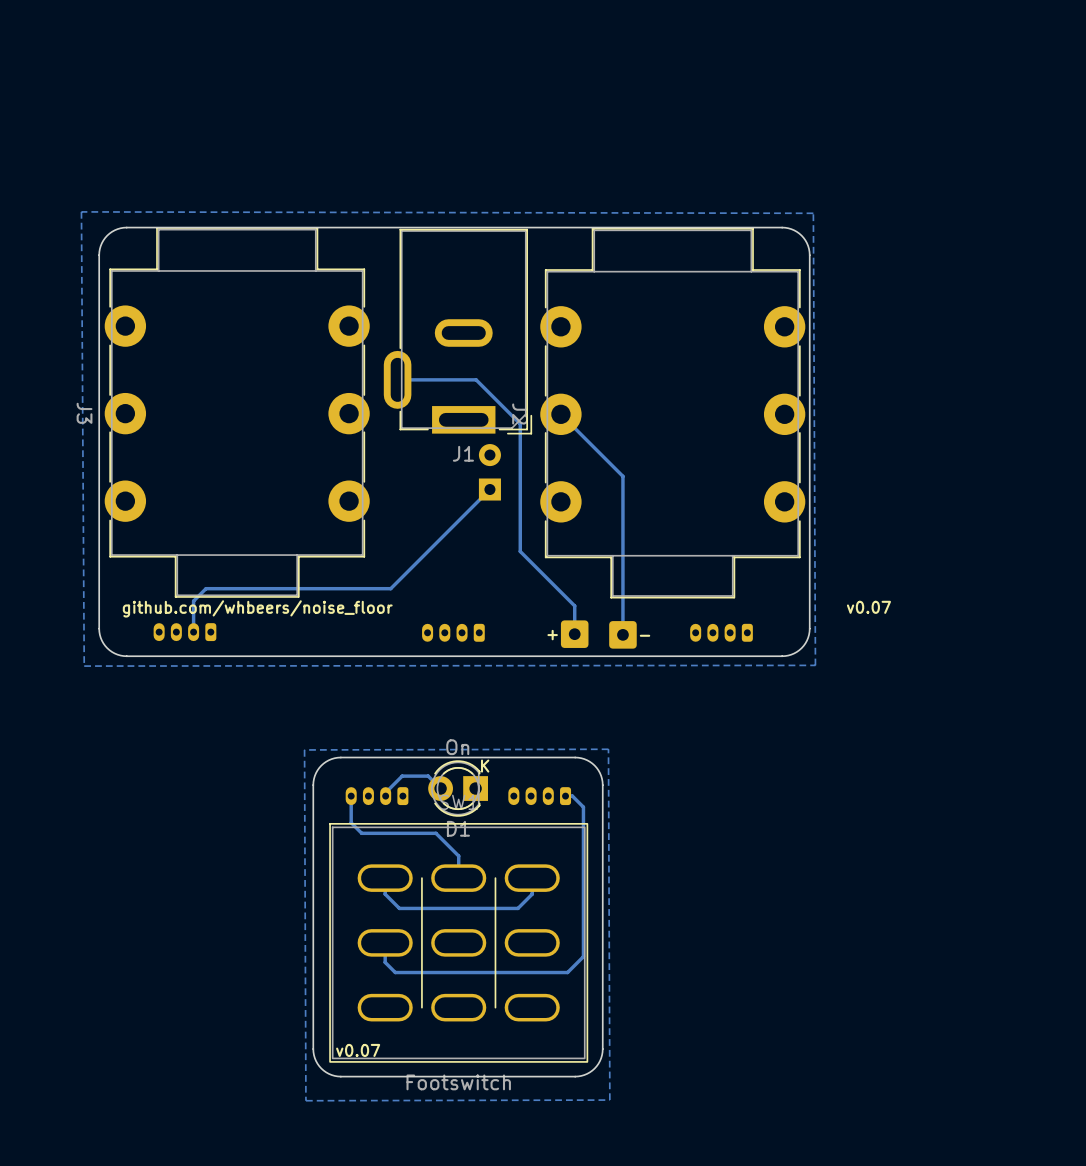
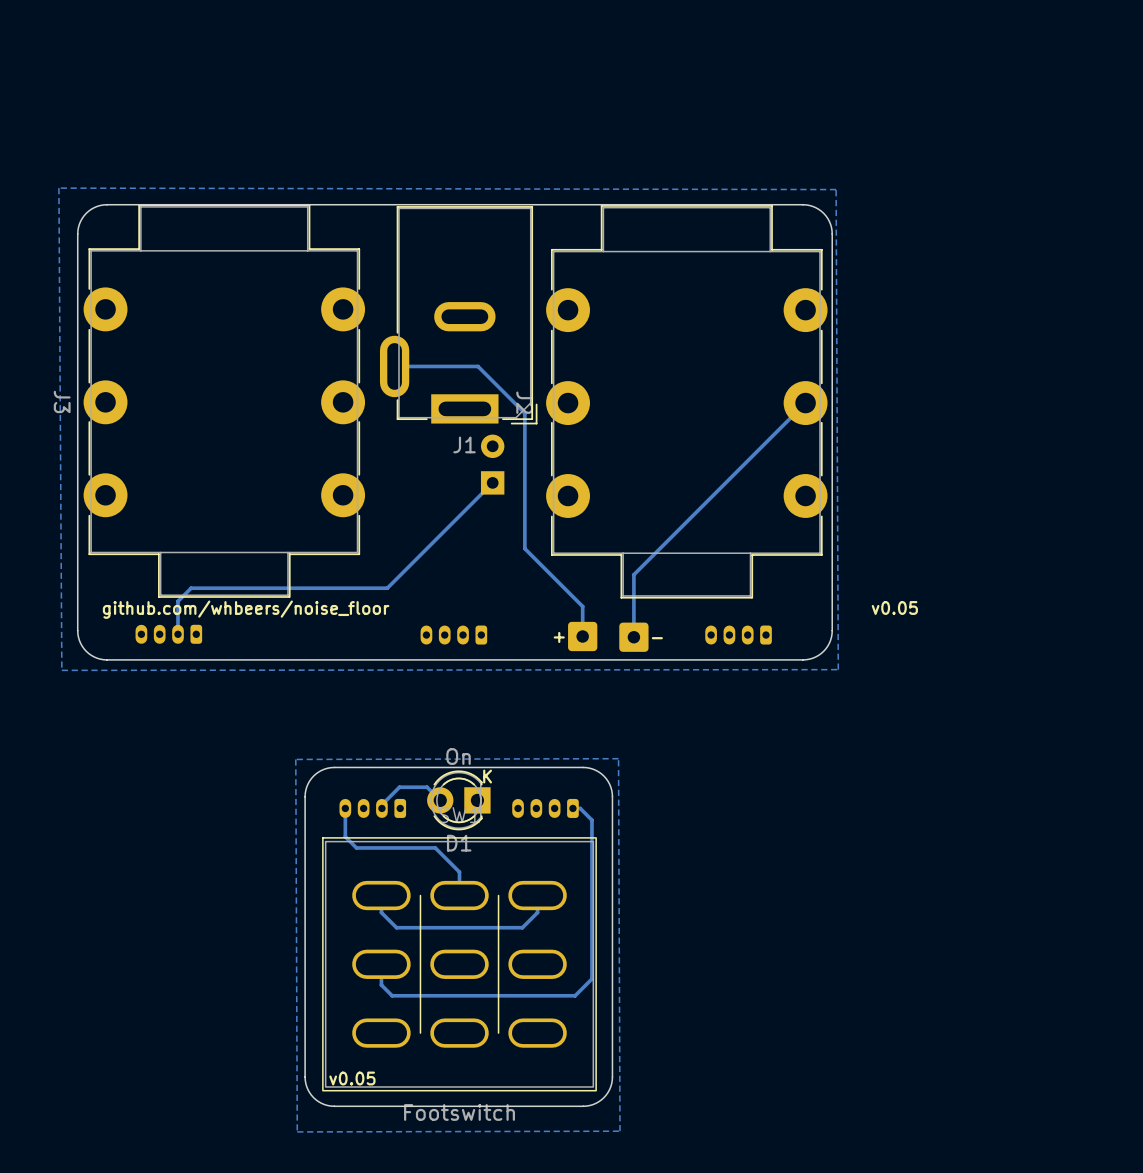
track: (560, 414) (622, 476) (622, 576) -> (805, 403) (633, 574)
text: github.com/whbeers/noise_floor v0.07 (506, 608) -> github.com/whbeers/noise_floor v0.05 (510, 609)
text: v0.07 (358, 1050) -> v0.05 (352, 1078)

